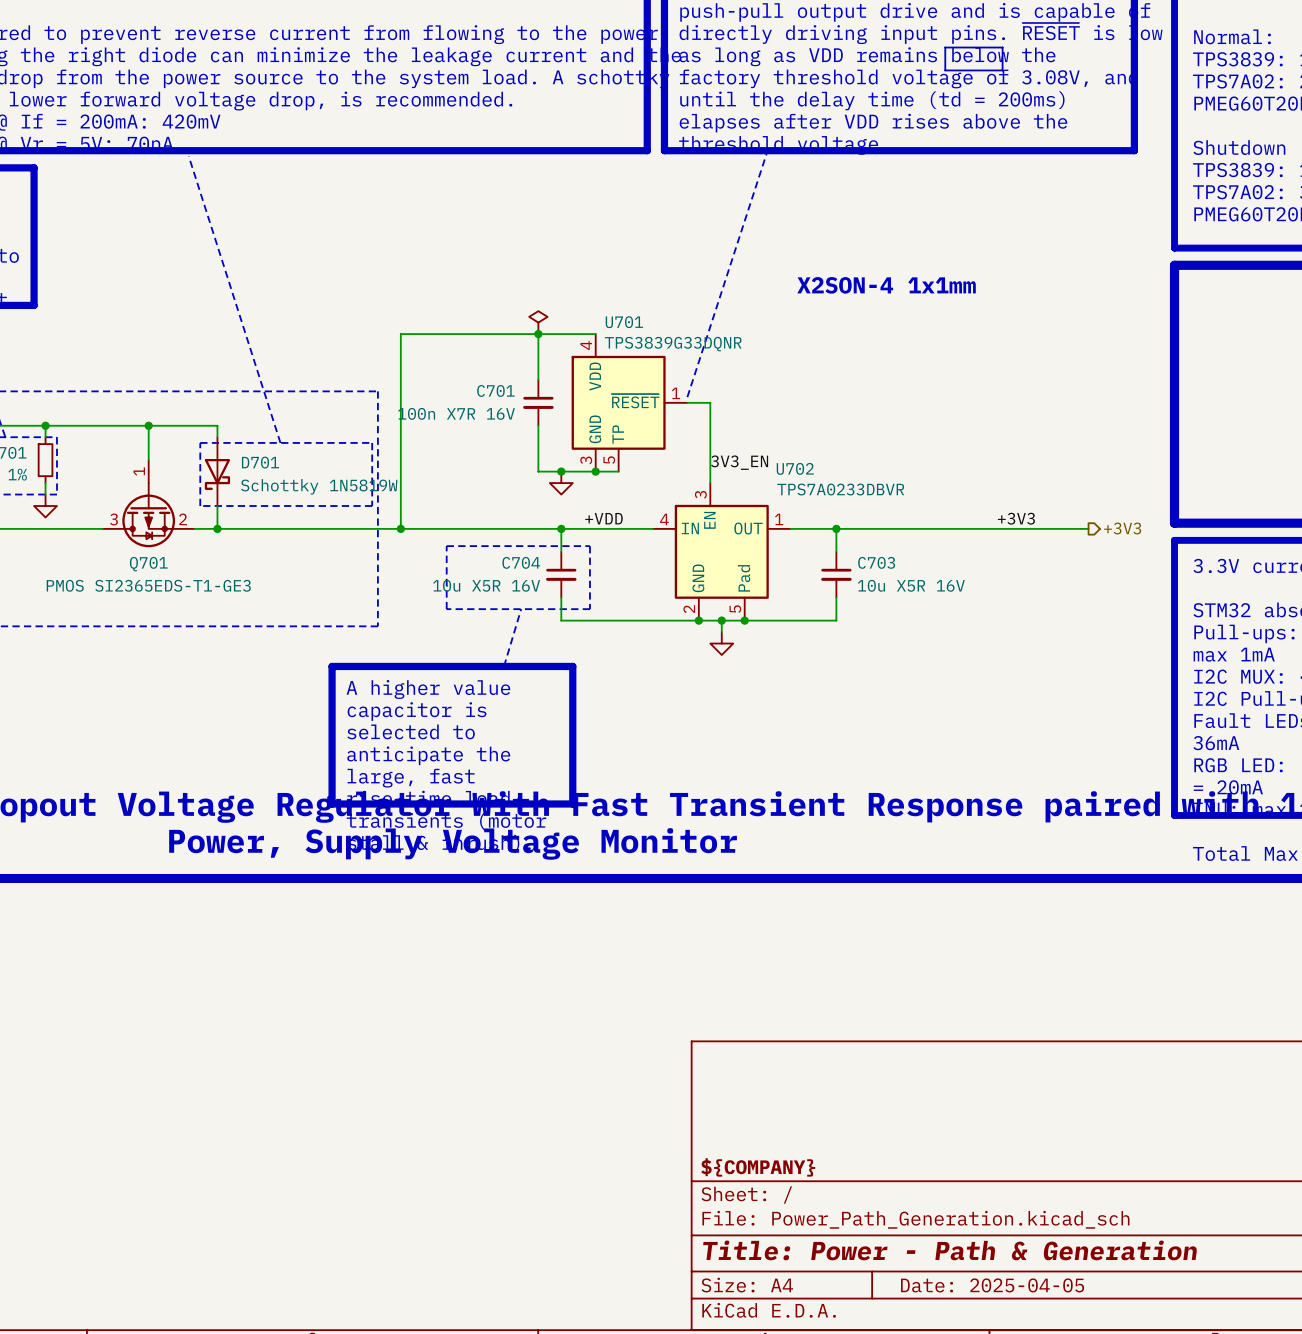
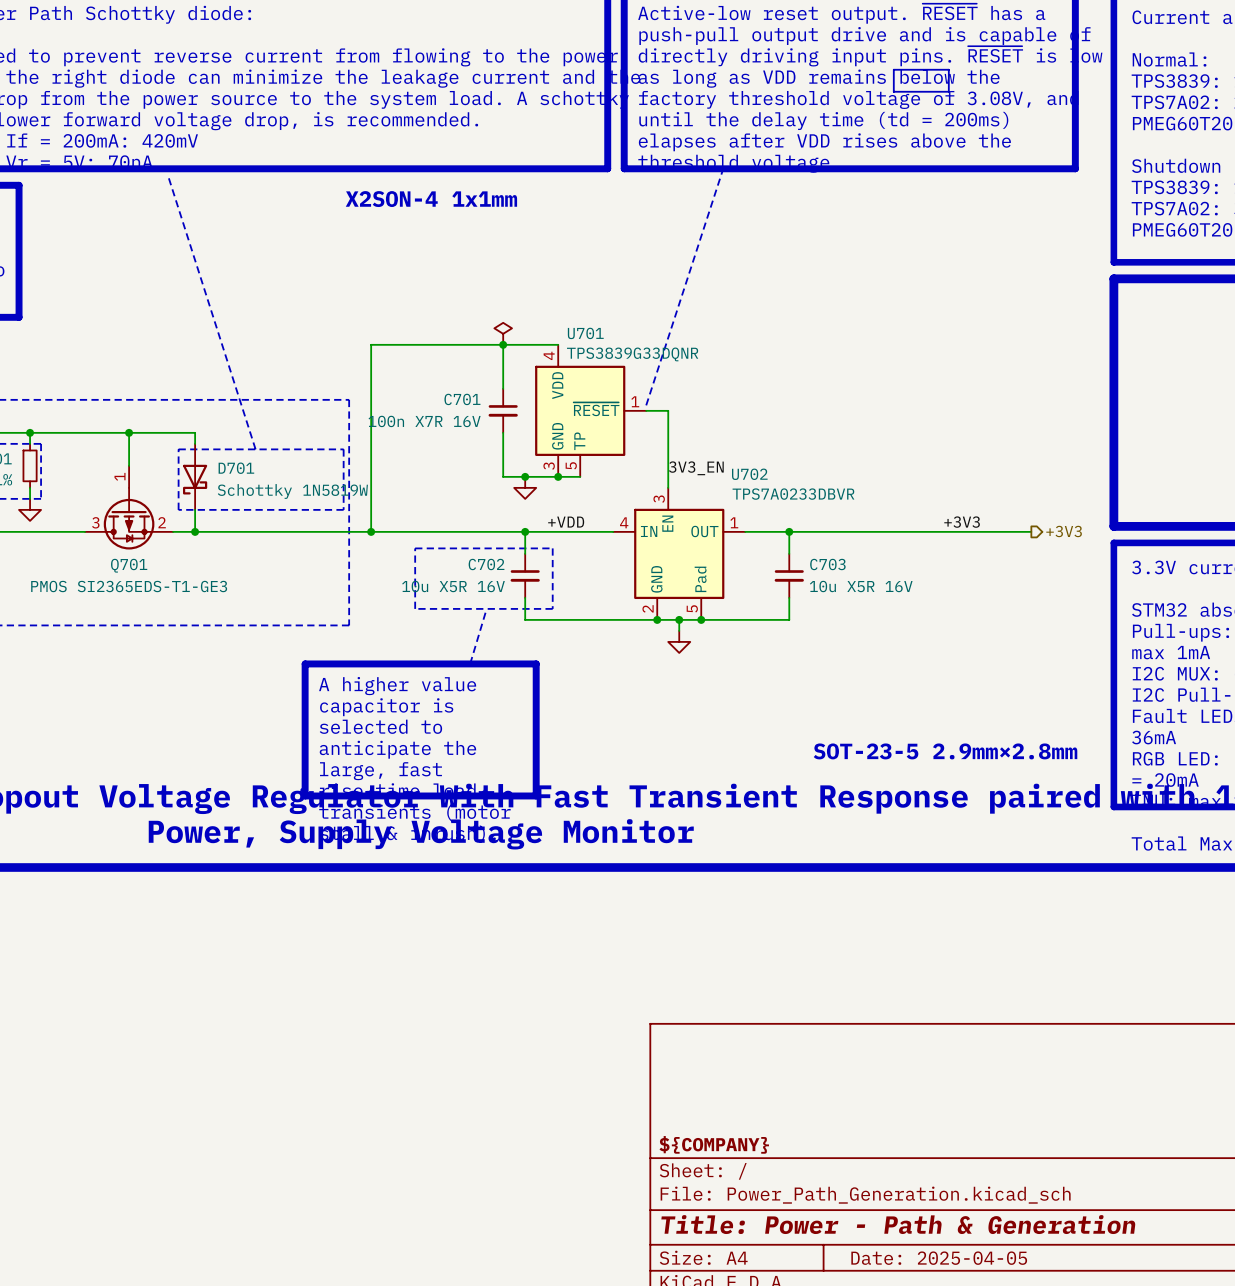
text: none -> X2SON-4 1x1mm (431, 199)
text: X2SON-4 1x1mm (886, 285) -> none
C704 name: C704 (521, 562) -> C702 (486, 564)
text: none -> SOT-23-5 2.9mm×2.8mm (945, 751)

